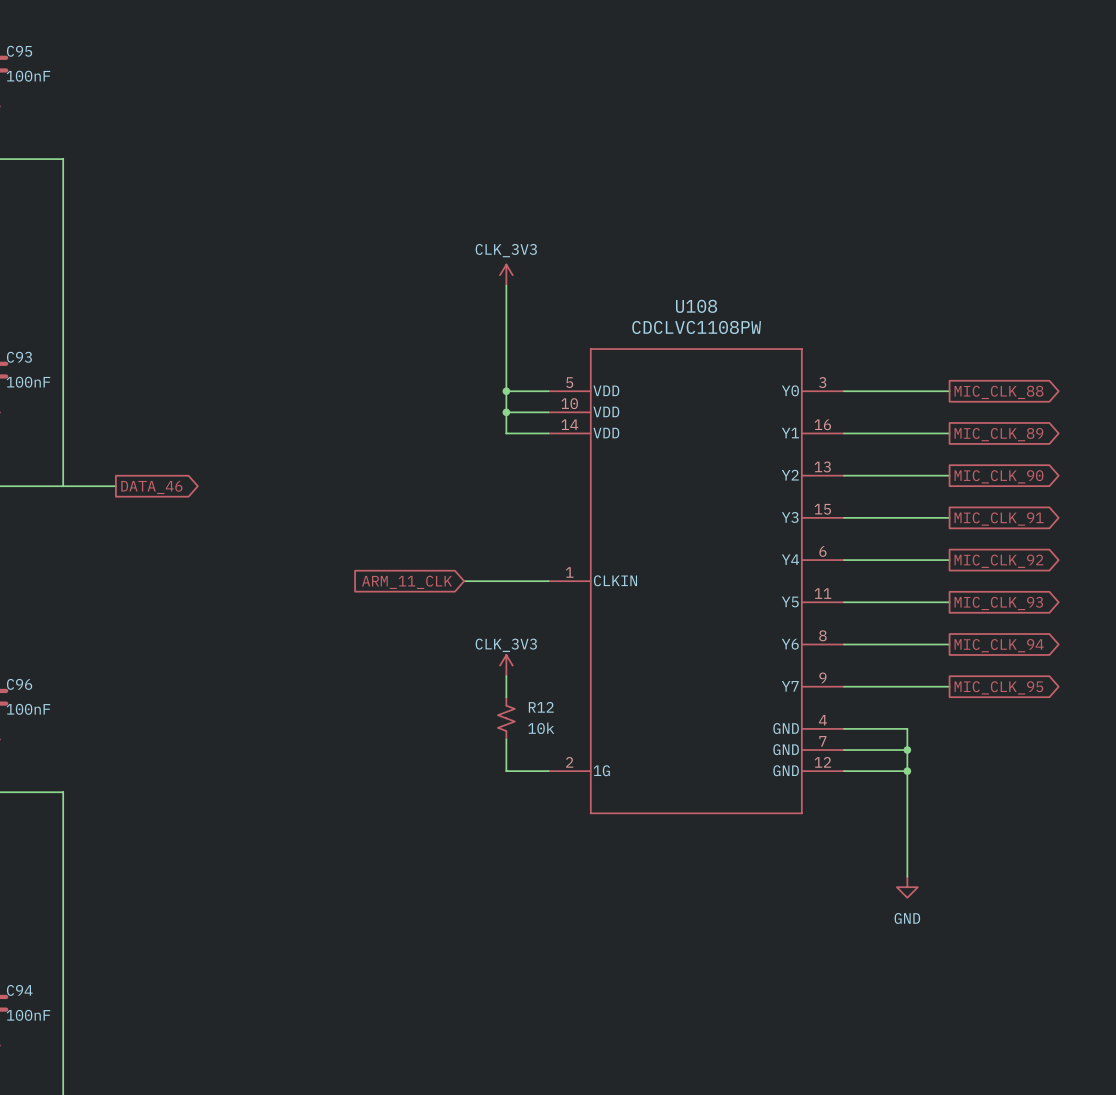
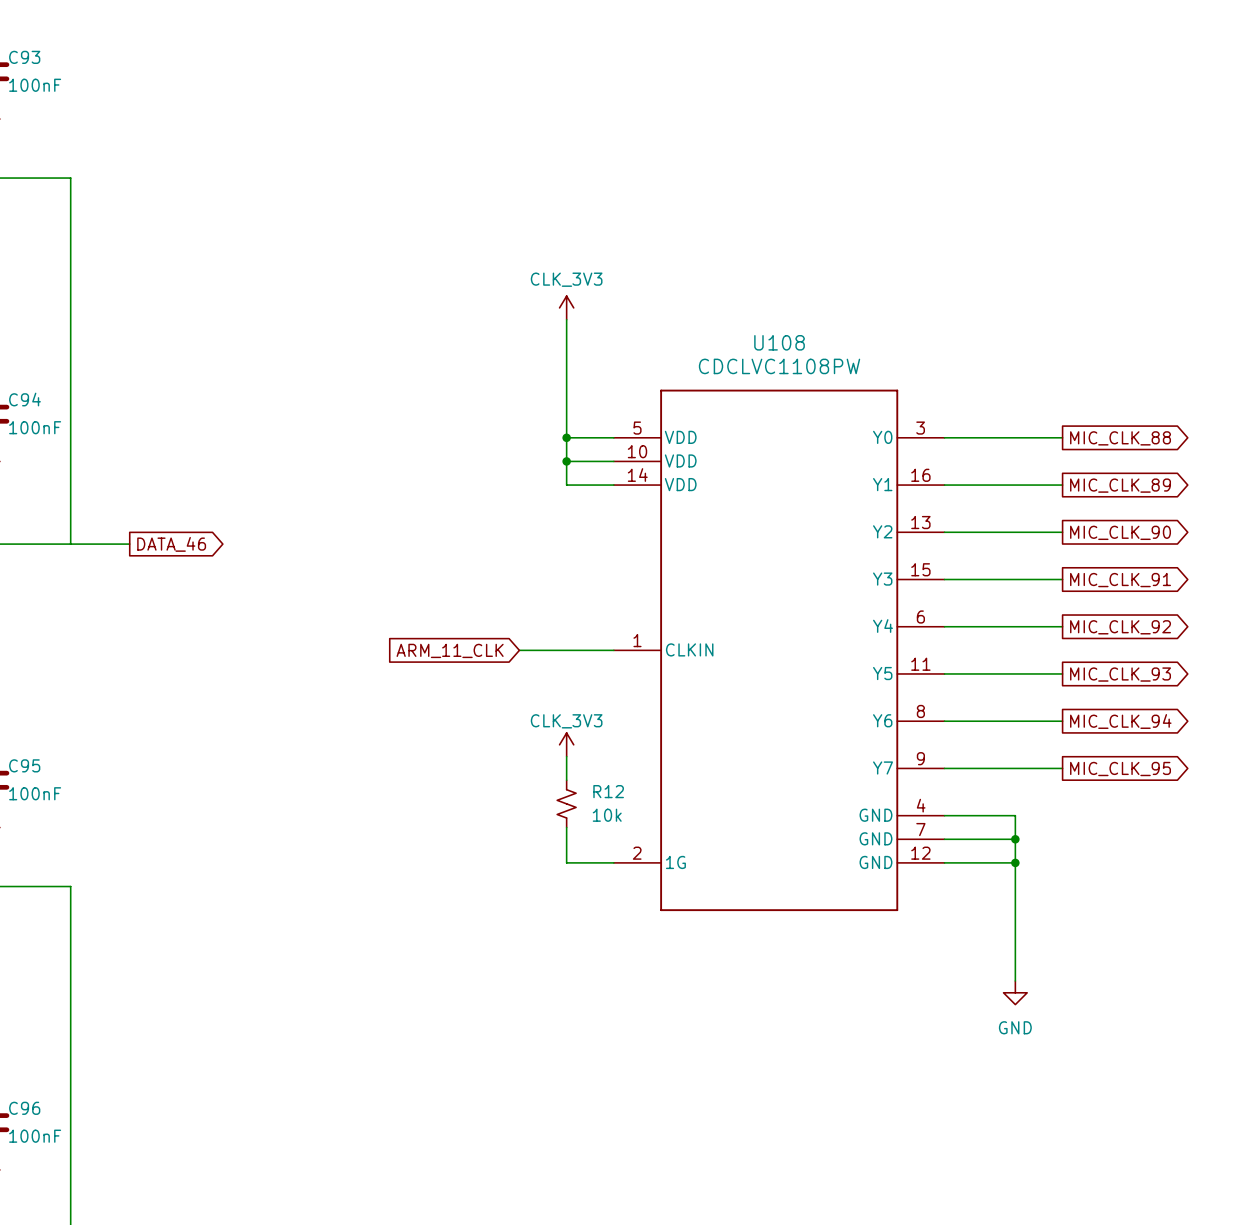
C95 name: C95 (19, 51) -> C93 (24, 57)
C93 name: C93 (19, 357) -> C94 (24, 399)
C96 name: C96 (19, 684) -> C95 (24, 765)
C94 name: C94 (19, 990) -> C96 (24, 1108)

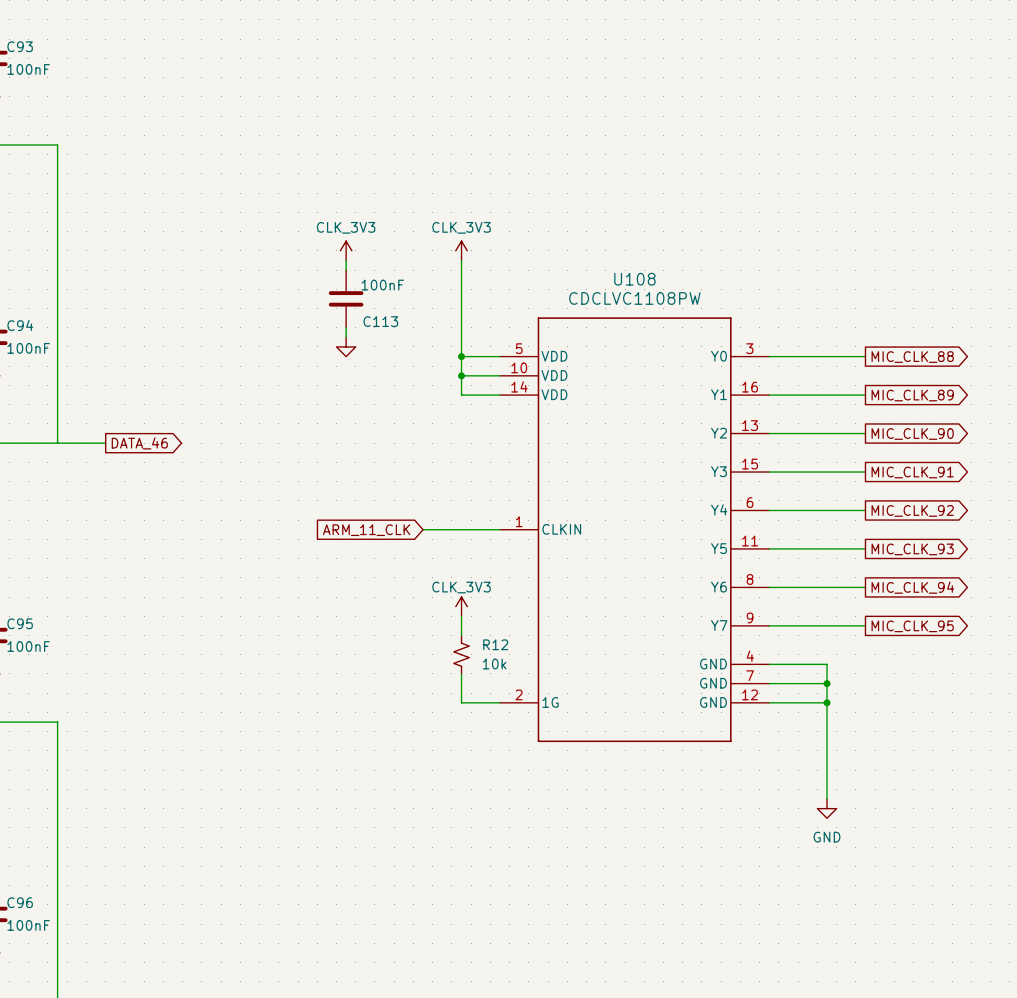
power symbol: none -> CLK_3V3 (346, 250)
wire: none -> (346, 260) (346, 270)
C113: none -> 100nF (346, 298)
wire: none -> (346, 327) (346, 337)
power symbol: none -> (346, 346)

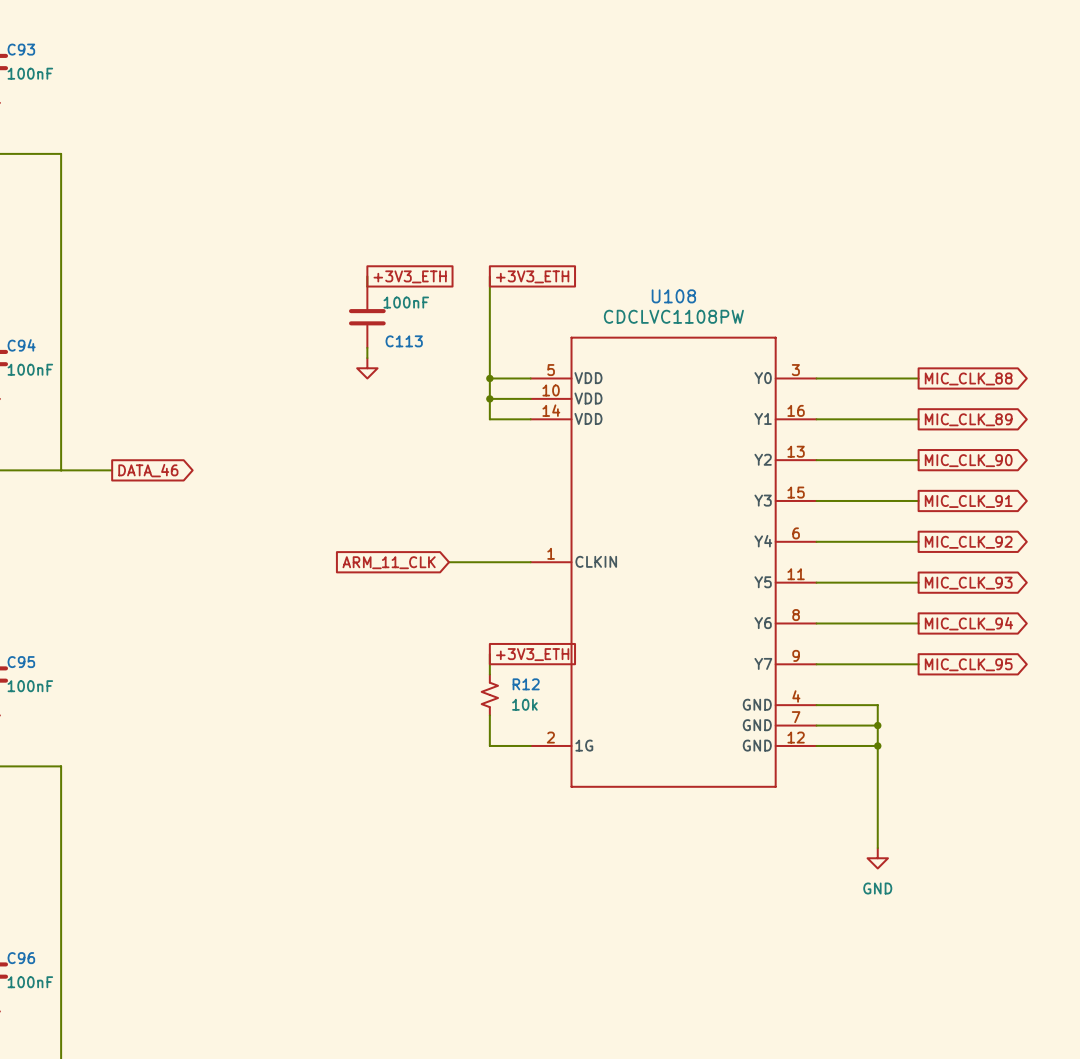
power symbol: CLK_3V3 (346, 250) -> none
power symbol: CLK_3V3 (461, 250) -> none
global label: none -> +3V3_ETH (410, 276)
global label: none -> +3V3_ETH (532, 276)
power symbol: CLK_3V3 (461, 606) -> none
global label: none -> +3V3_ETH (532, 654)

